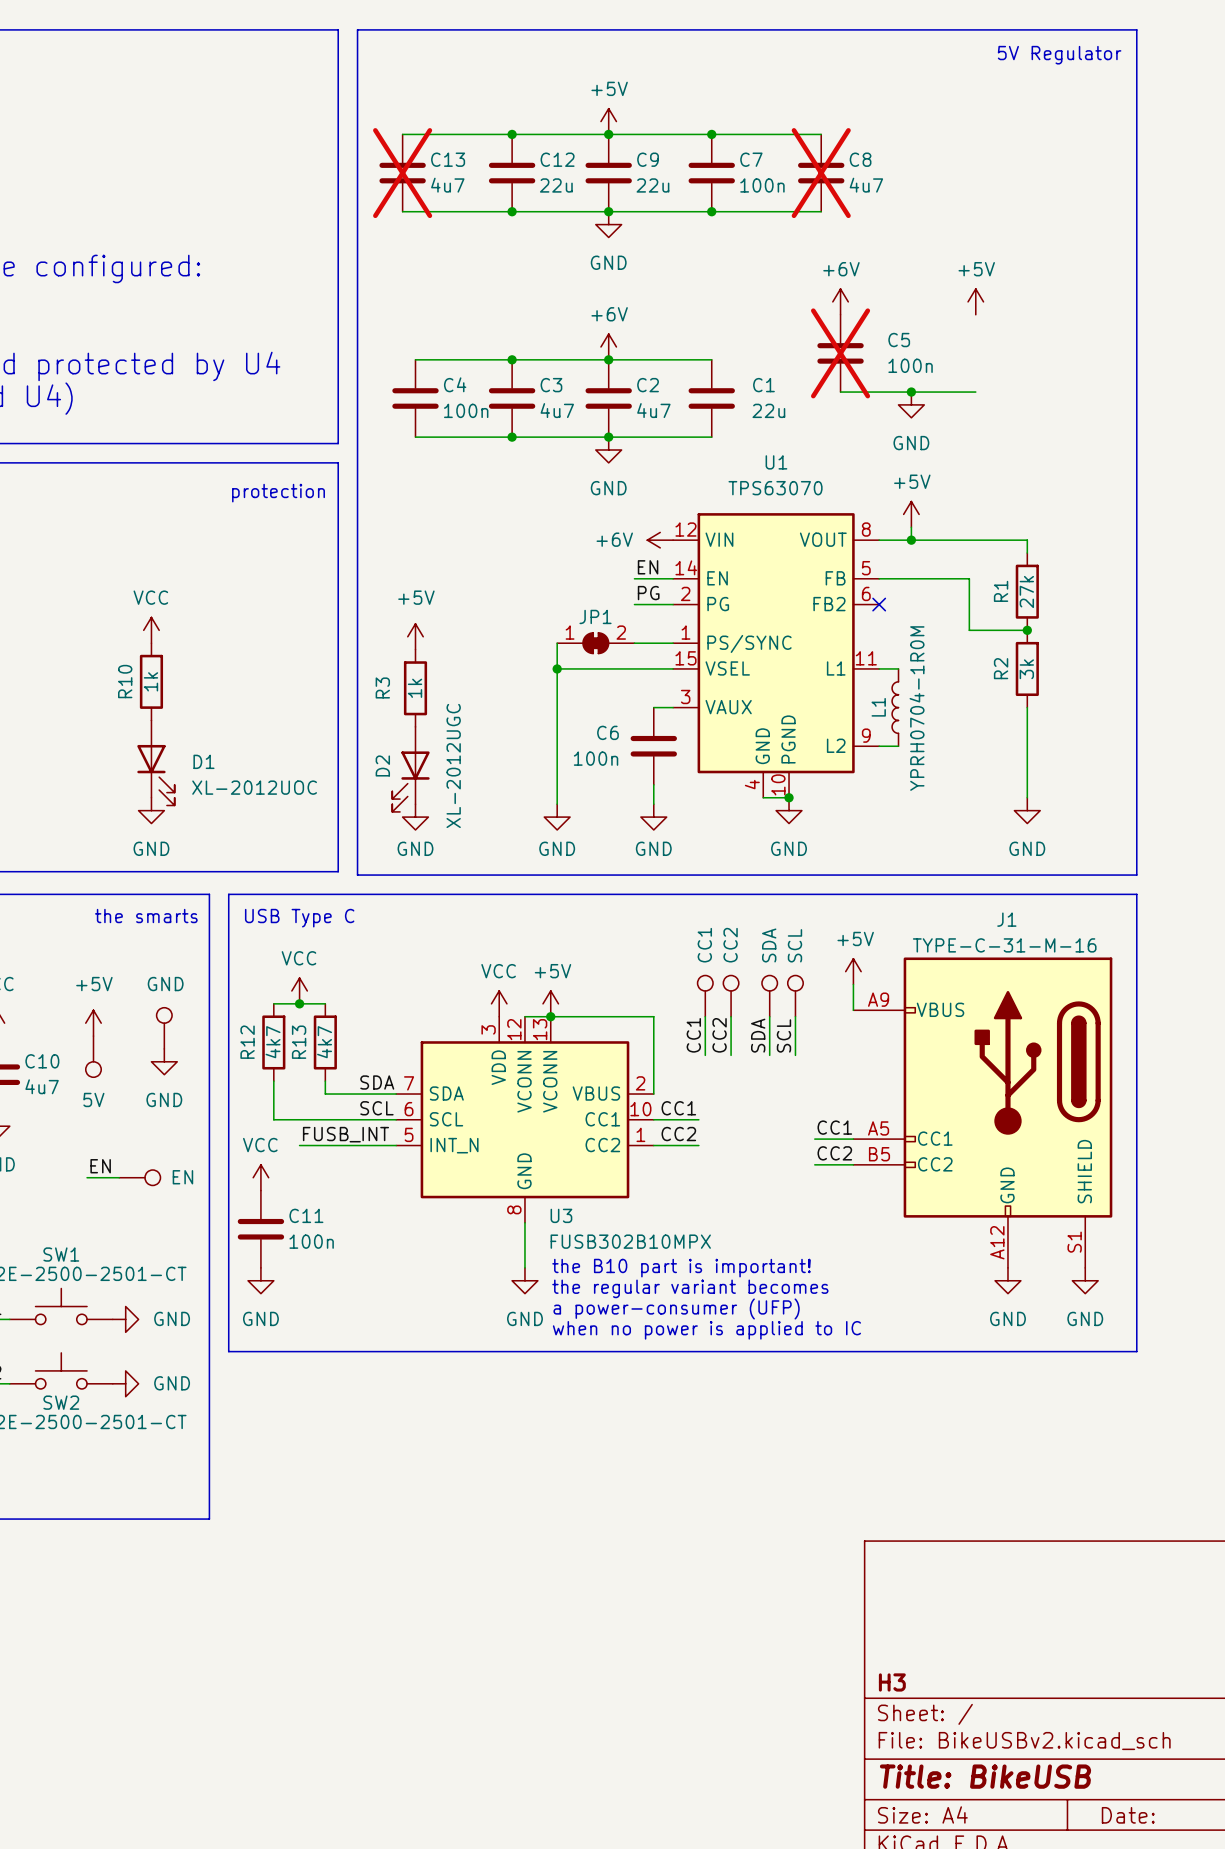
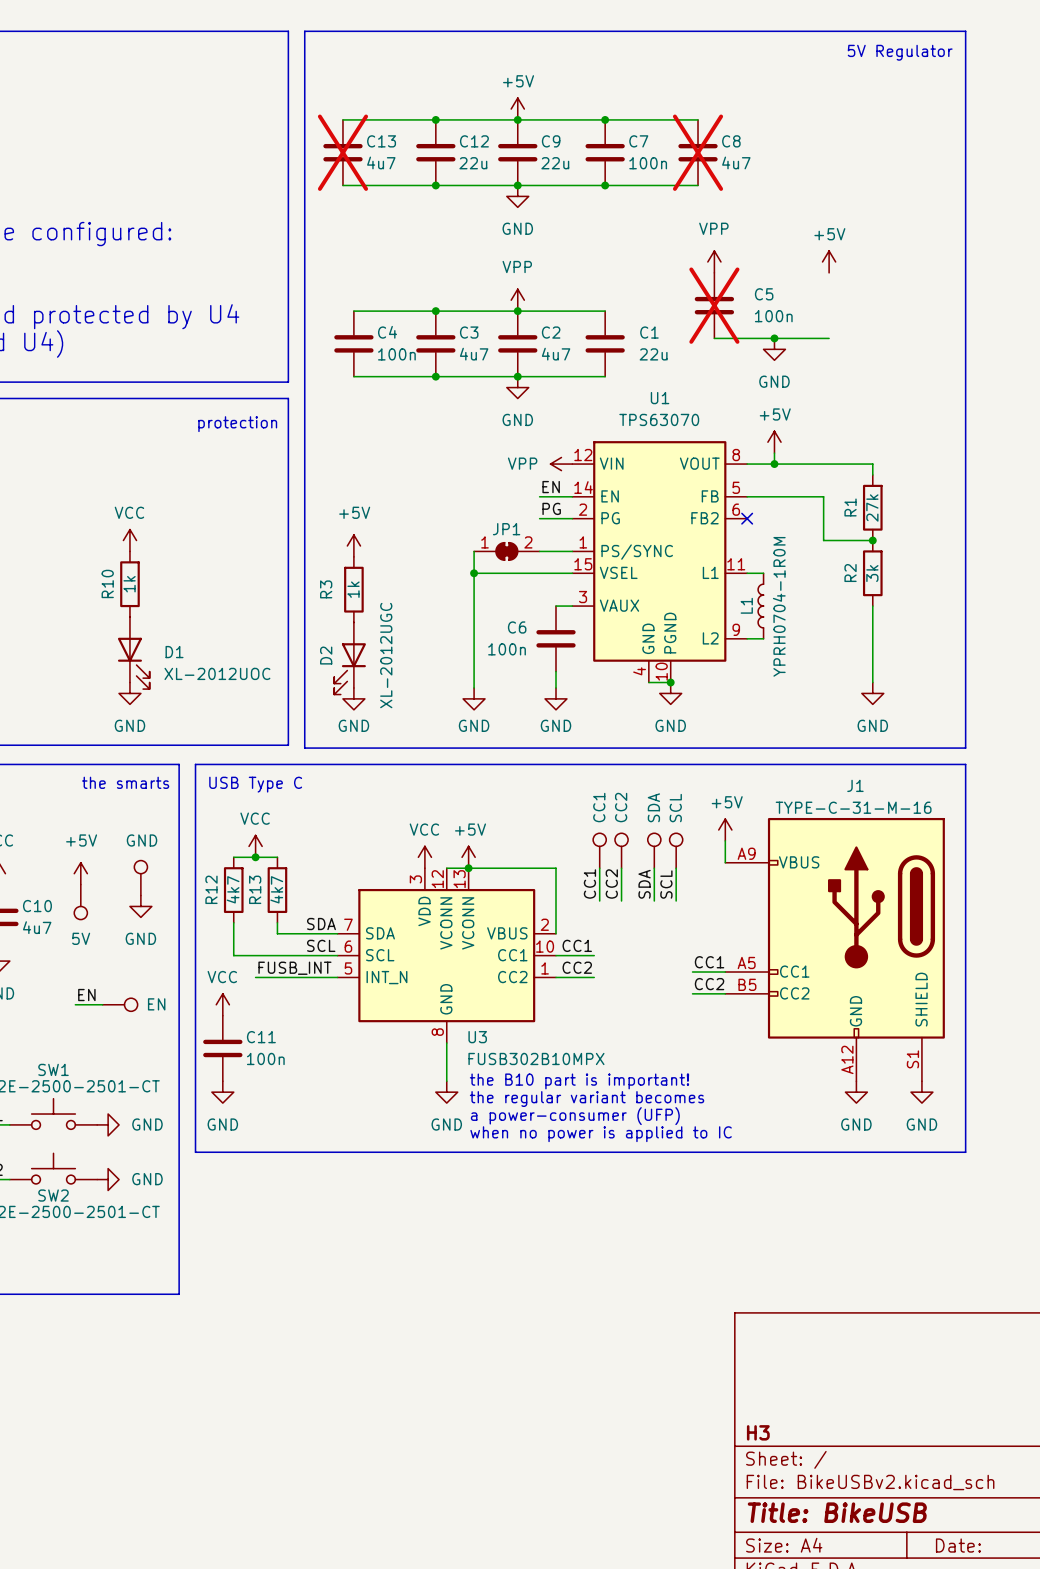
power symbol: +6V (840, 301) -> VPP (714, 261)
power symbol: +6V (608, 346) -> VPP (517, 300)
power symbol: +6V (660, 540) -> VPP (561, 464)

